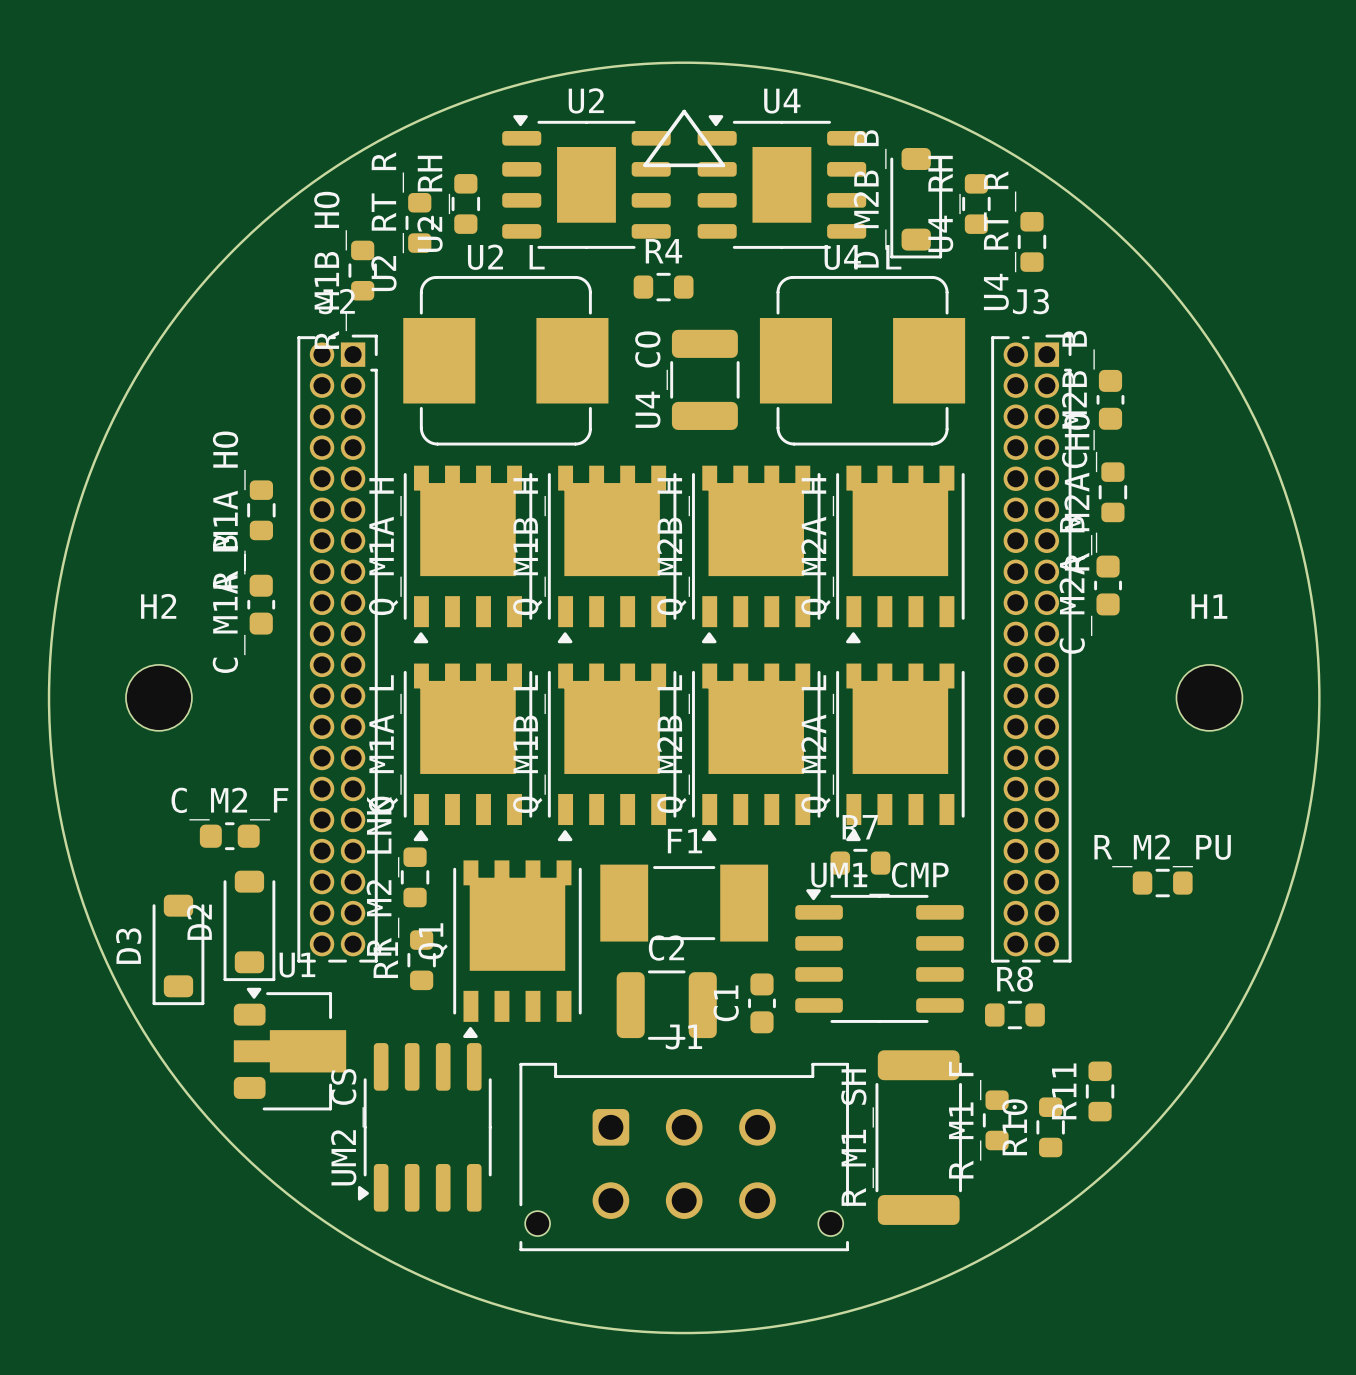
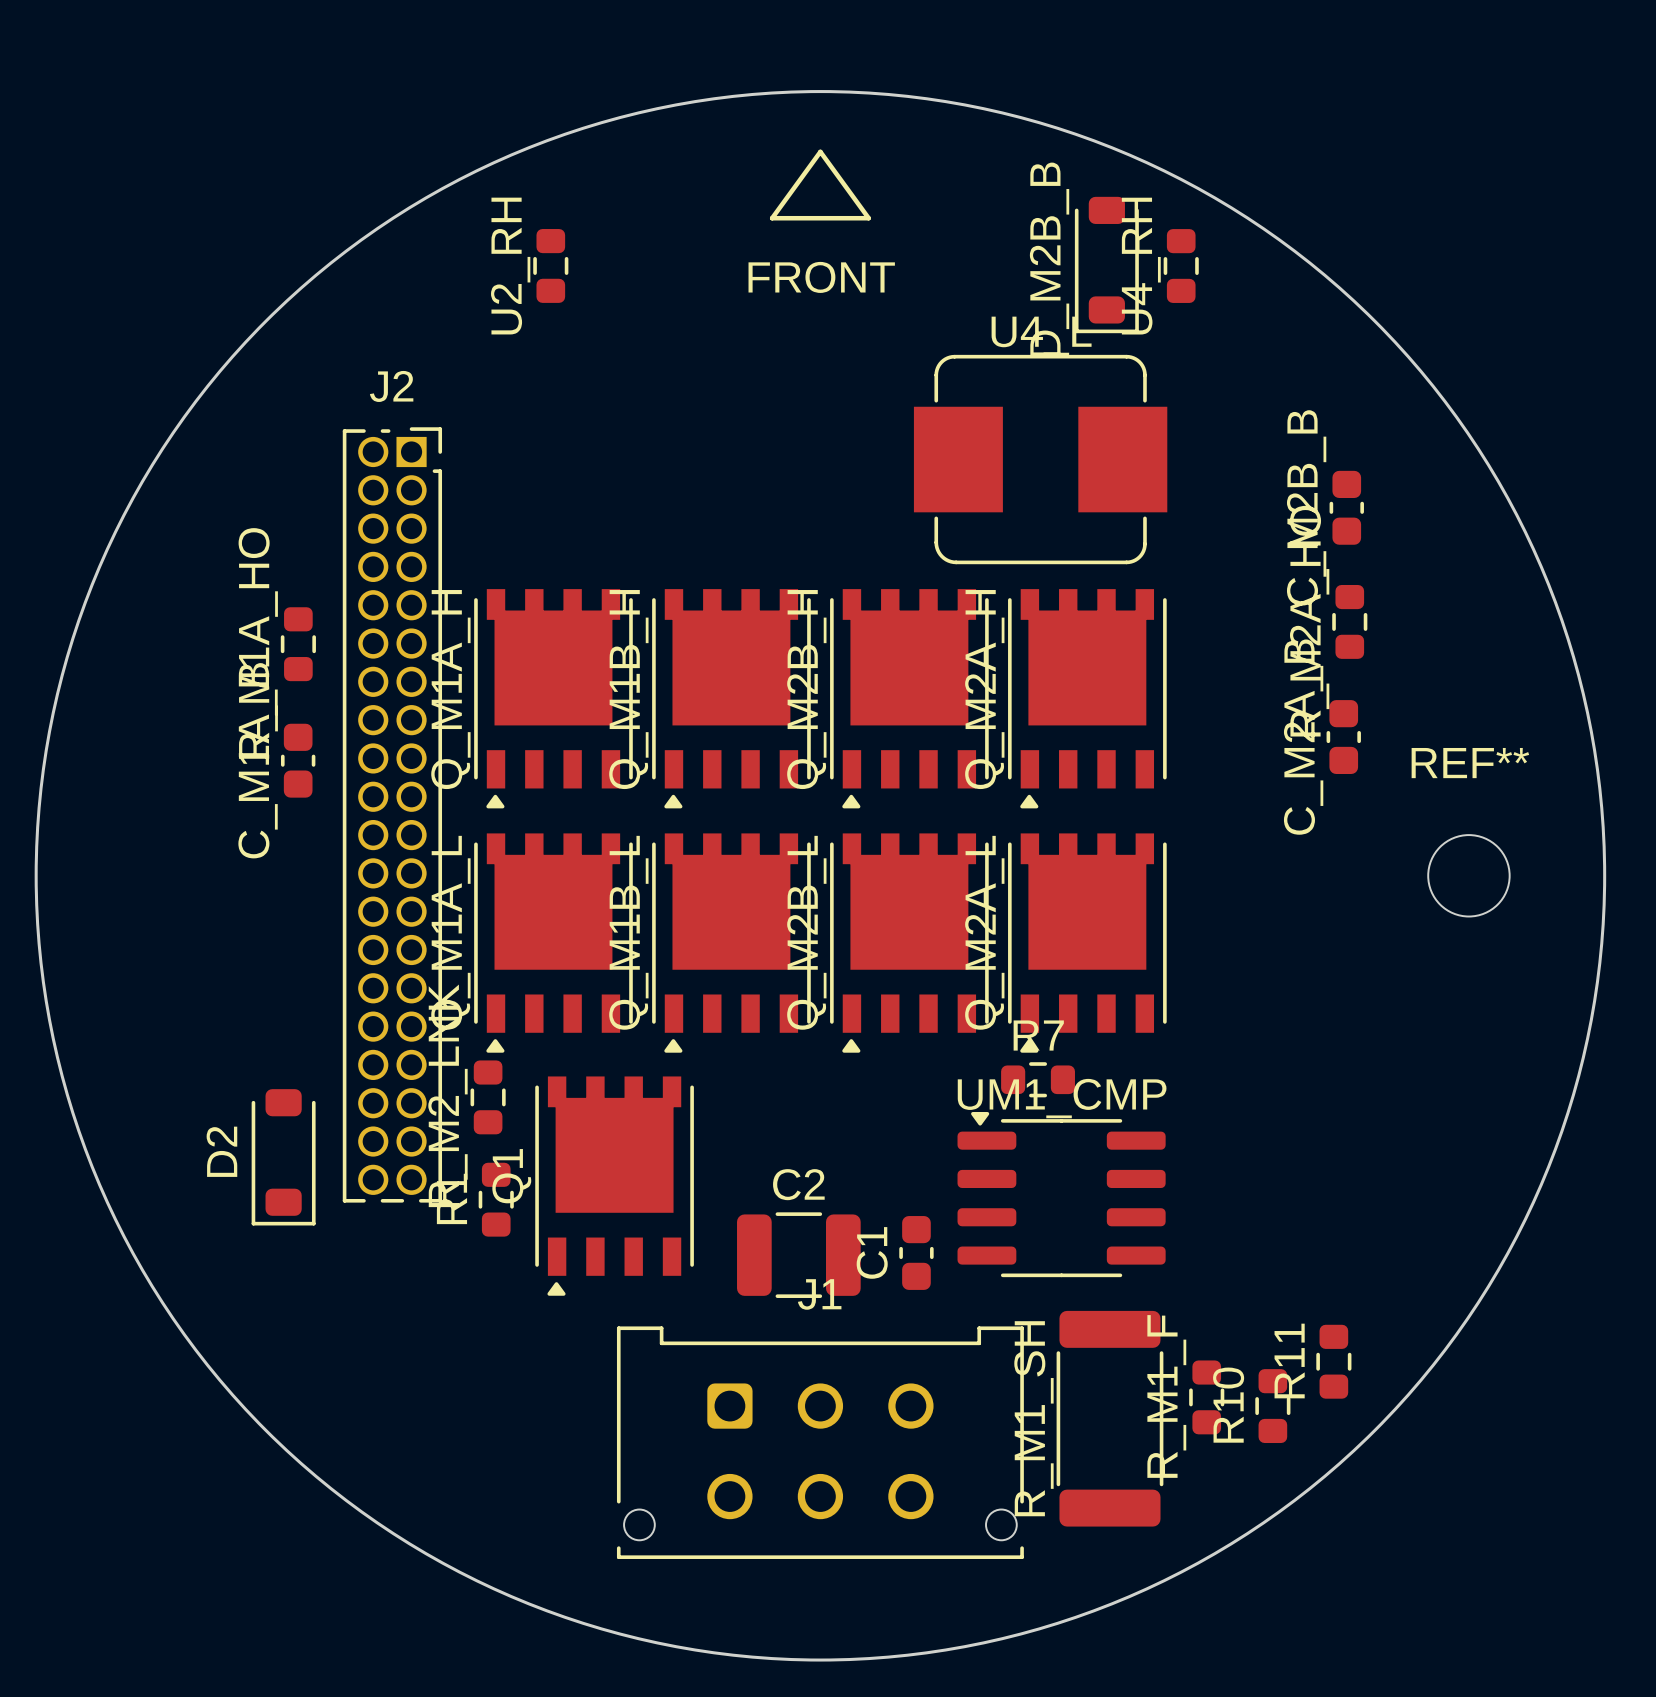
U2: (586, 181) -> none
U4: (781, 181) -> none
text: none -> FRONT (821, 277)
U2_RT_R: (419, 222) -> none
U4_RT_R: (1031, 241) -> none
R_M1B_HO: (362, 270) -> none
R4: (663, 287) -> none
U2_L: (505, 360) -> none
U4_CO: (704, 379) -> none
H1 name: H1 (1209, 606) -> REF** (1470, 763)
J3: (1031, 648) -> none
H2: (158, 697) -> none
C_M2_F: (229, 836) -> none
R_M2_PU: (1162, 883) -> none
F1: (684, 903) -> none
D3: (178, 949) -> none
R8: (1014, 1015) -> none
U1: (290, 1049) -> none
UM2_CS: (424, 1127) -> none

